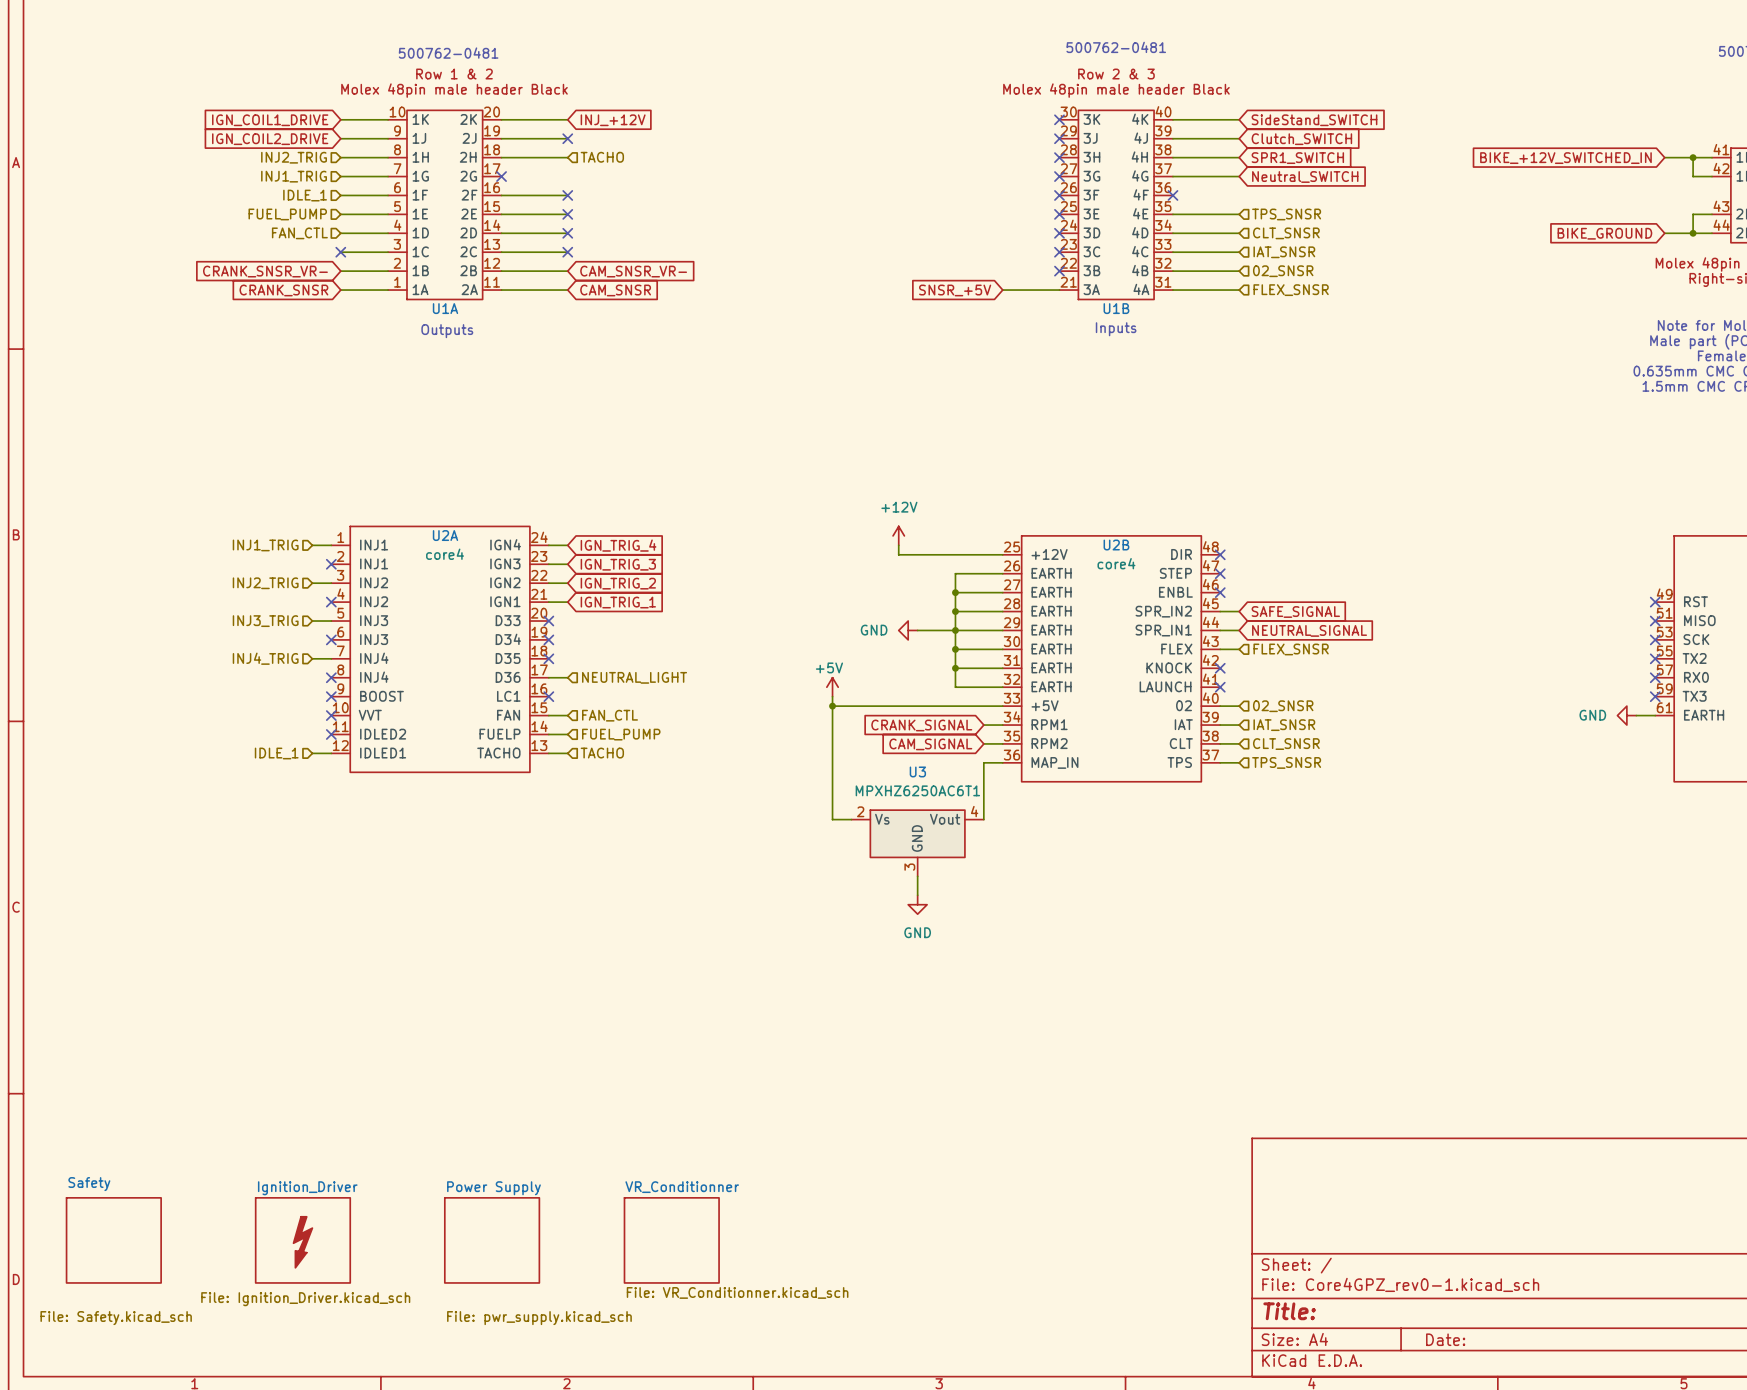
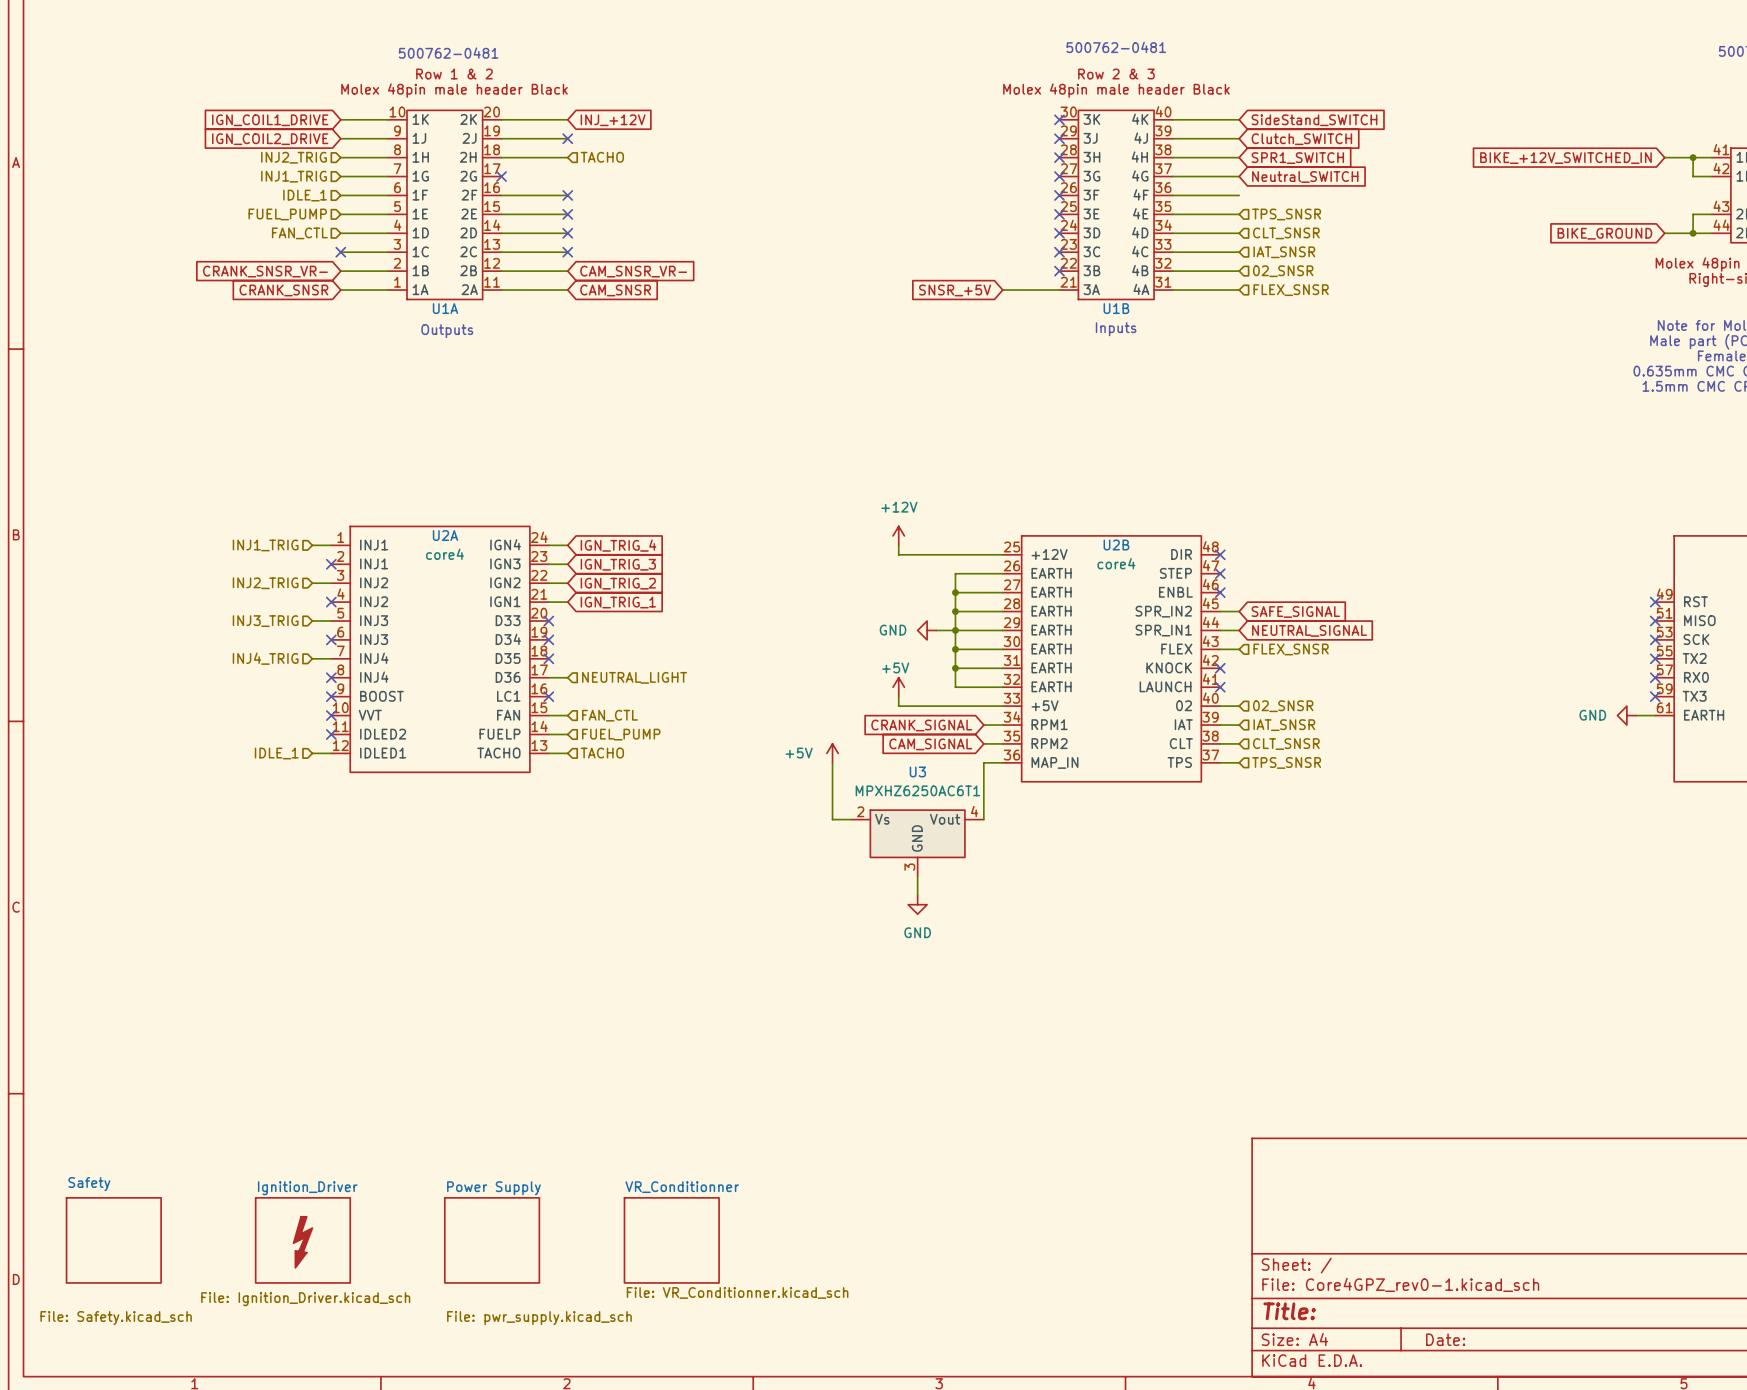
wire: none -> (1172, 195) (1239, 195)
no-connect mark: (1172, 195) -> none
power symbol position: GND (908, 630) -> GND (927, 630)
power symbol: +5V (832, 687) -> none
power symbol: none -> +5V (898, 687)
wire: (832, 696) (832, 762) -> none
wire: (832, 706) (898, 706) -> (898, 696) (898, 706)
junction: (832, 706) -> none
power symbol: none -> +5V (832, 753)

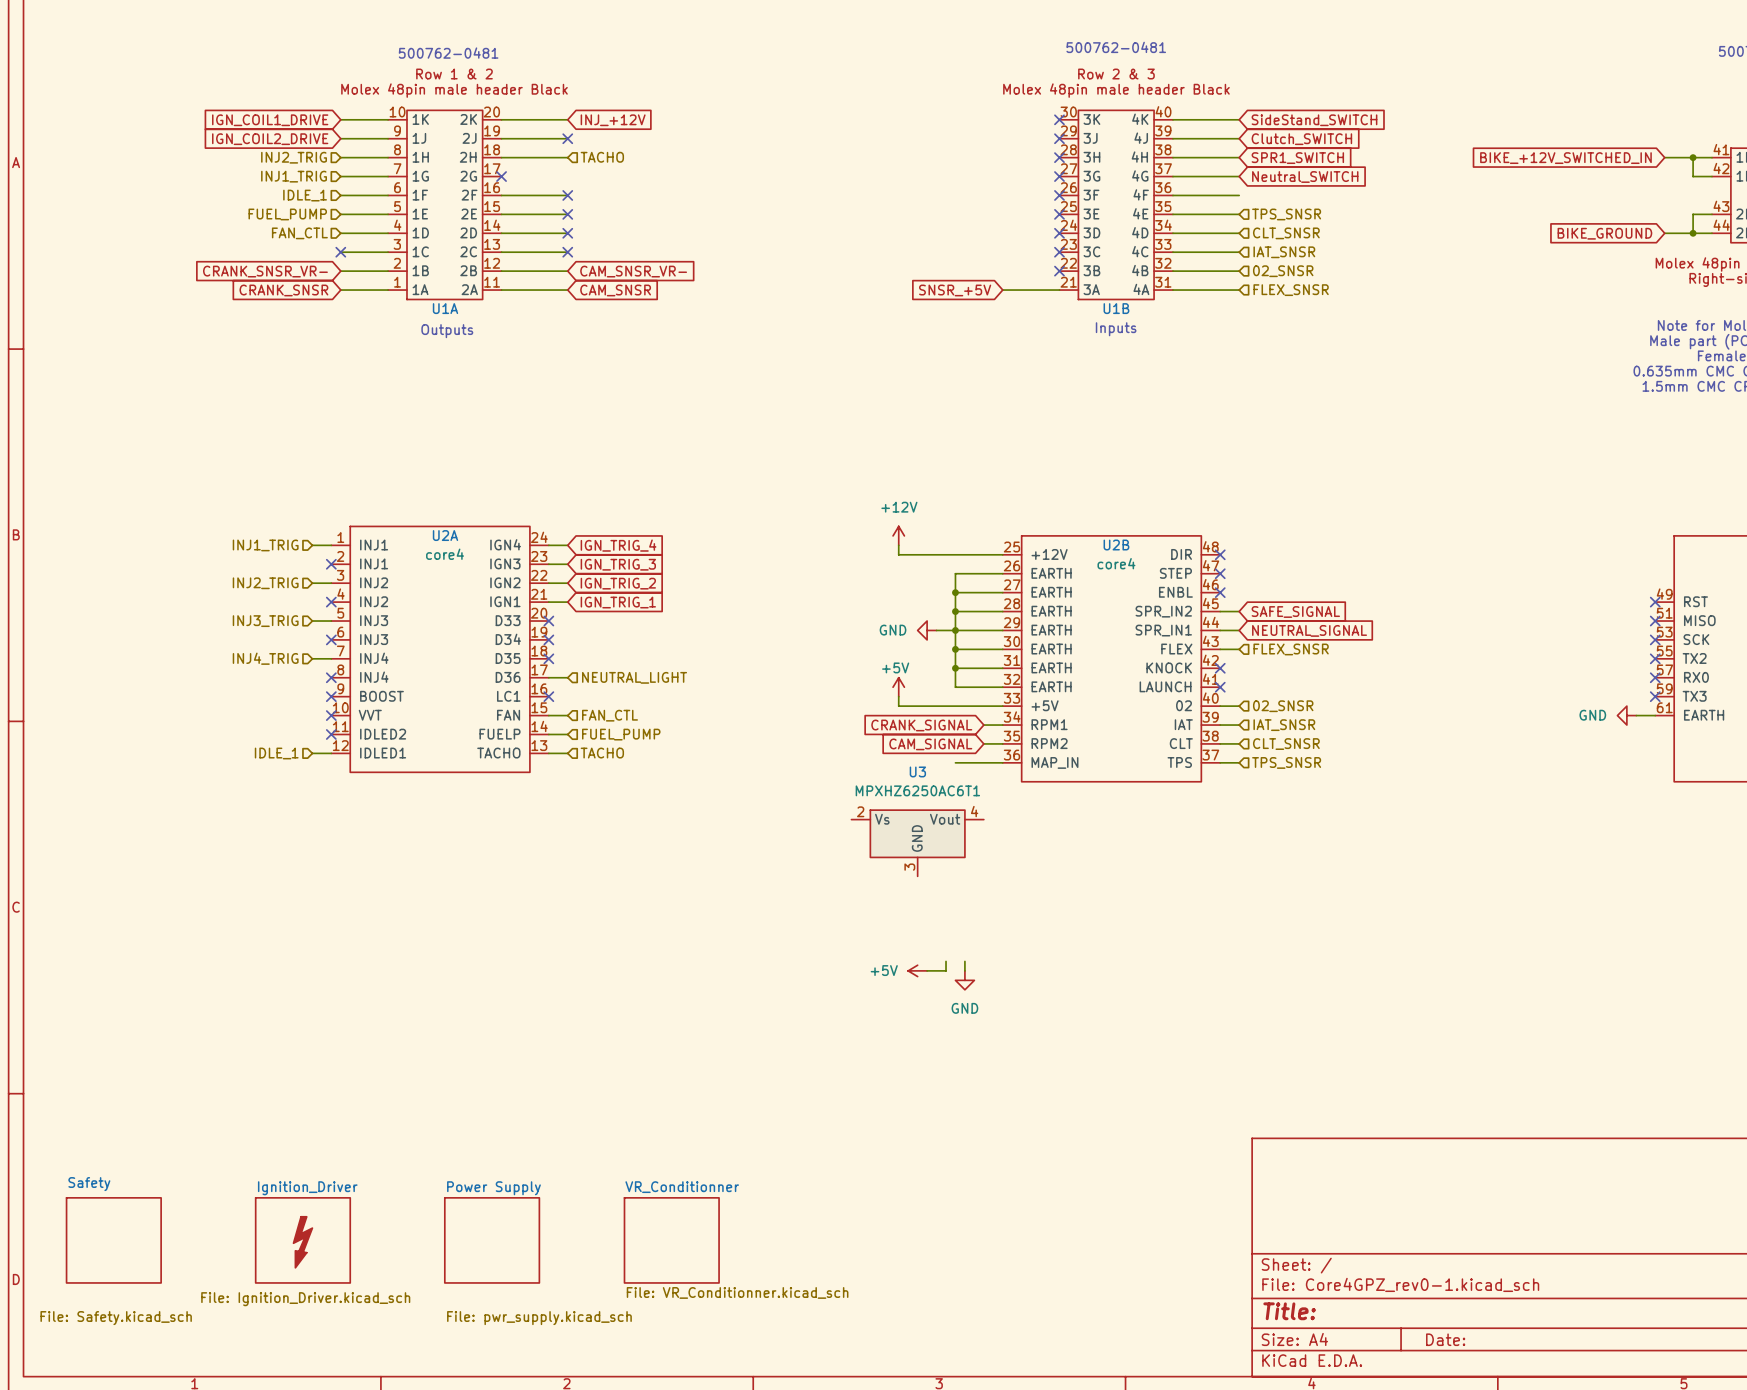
power symbol: +5V (832, 753) -> none
wire: (832, 762) (832, 819) (851, 819) -> none
wire: (983, 762) (983, 819) -> (983, 762) (955, 762)
wire: (917, 876) (917, 895) -> none
power symbol position: GND (917, 904) -> GND (964, 980)
wire: none -> (946, 961) (946, 970) (927, 970)
wire: none -> (964, 961) (964, 970)
power symbol: none -> +5V (917, 970)

